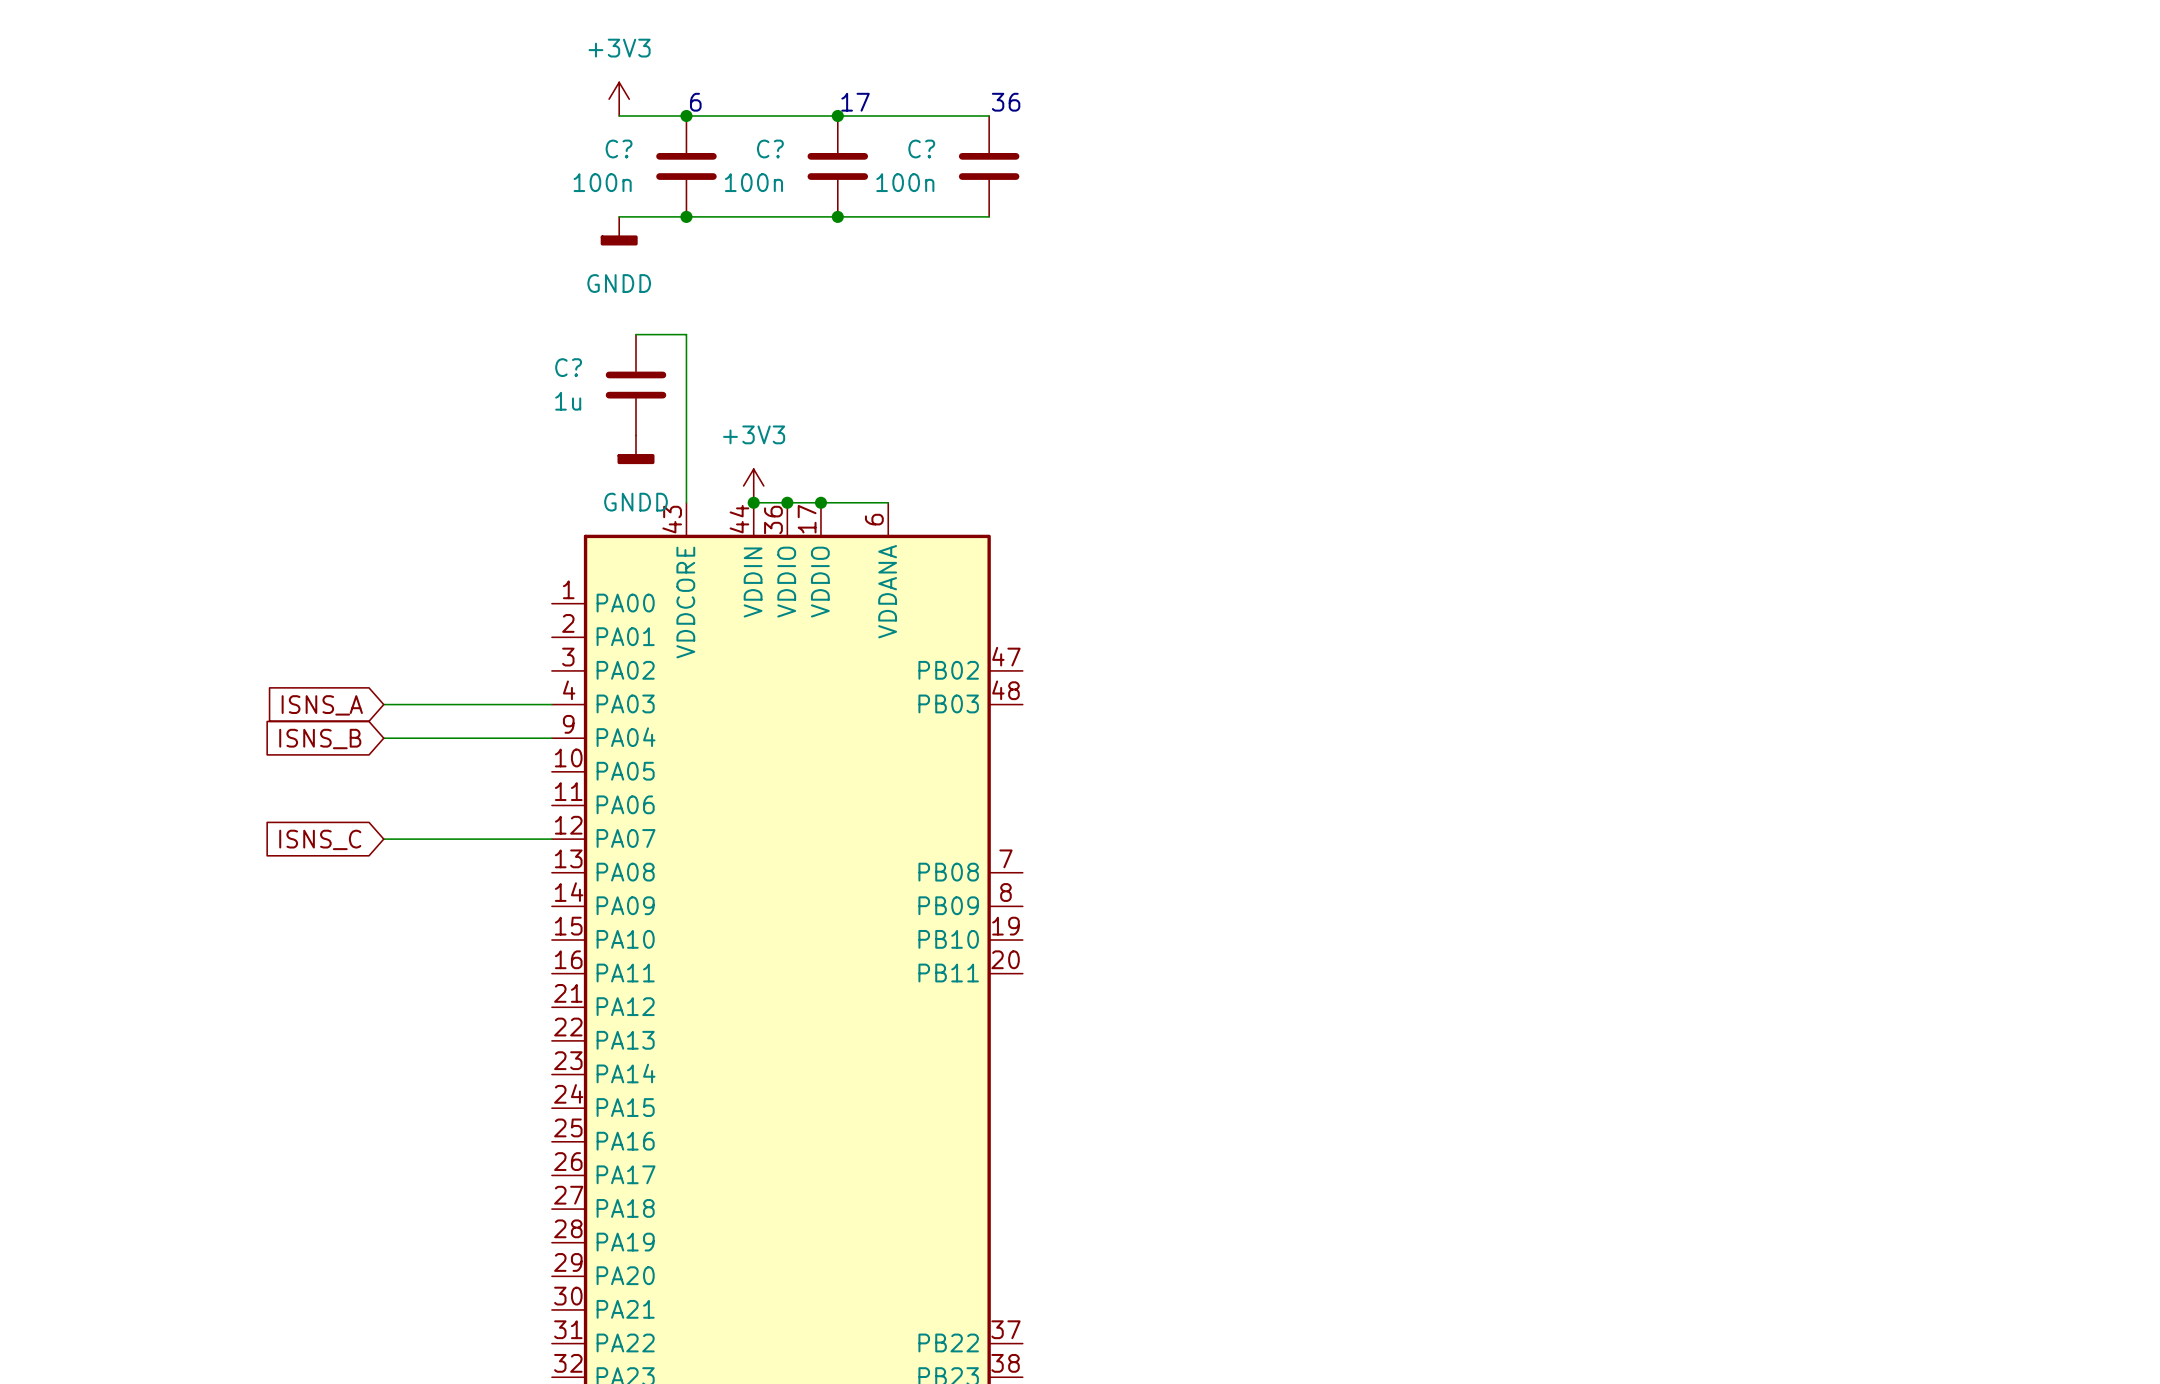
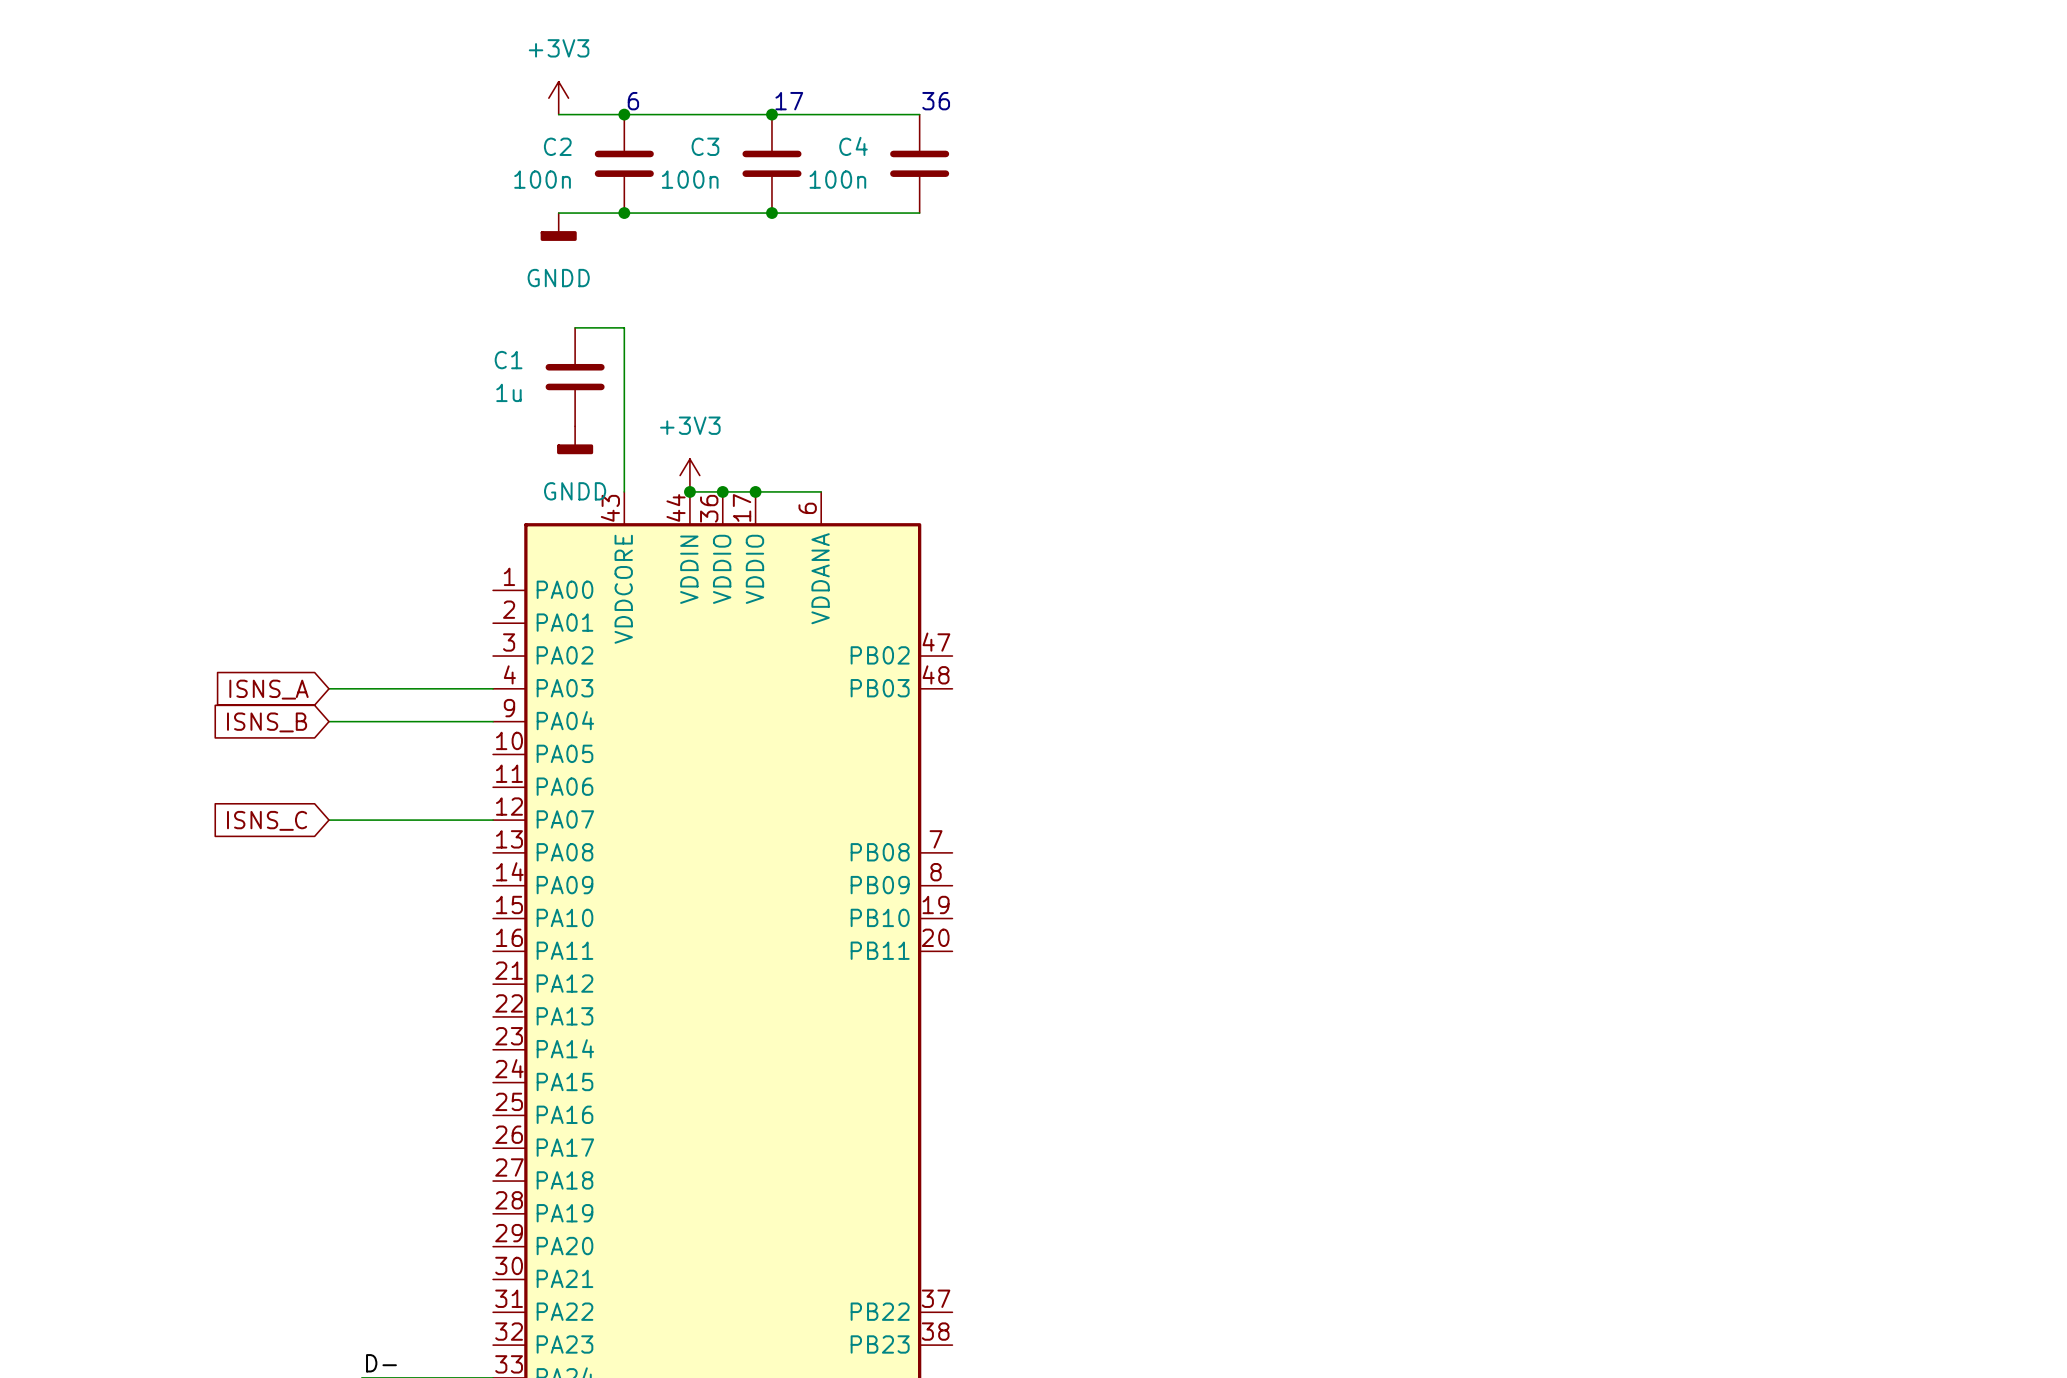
C? name: C? (619, 149) -> C2 (557, 146)
C? name: C? (770, 149) -> C3 (705, 146)
C? name: C? (921, 149) -> C4 (853, 146)
C? name: C? (568, 367) -> C1 (508, 360)

